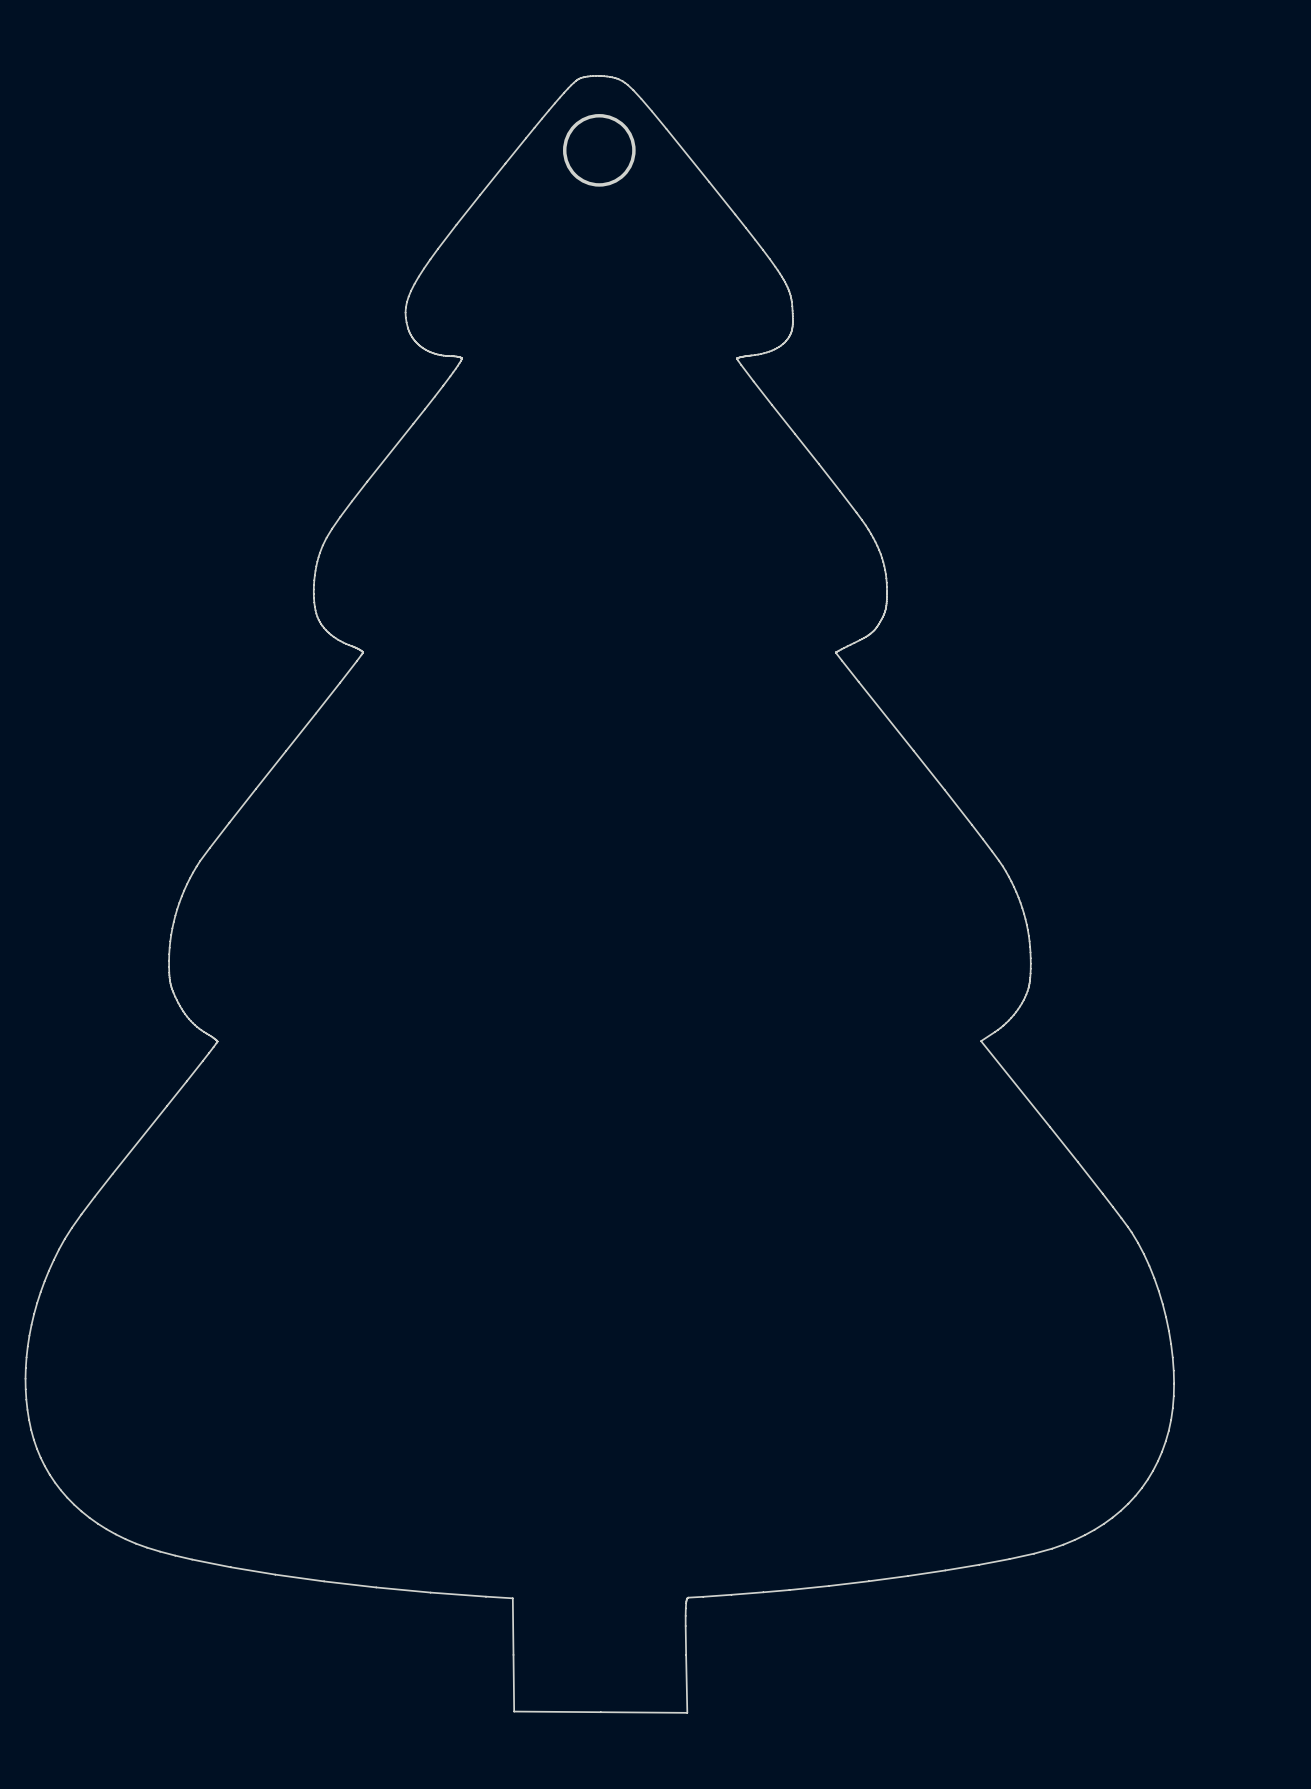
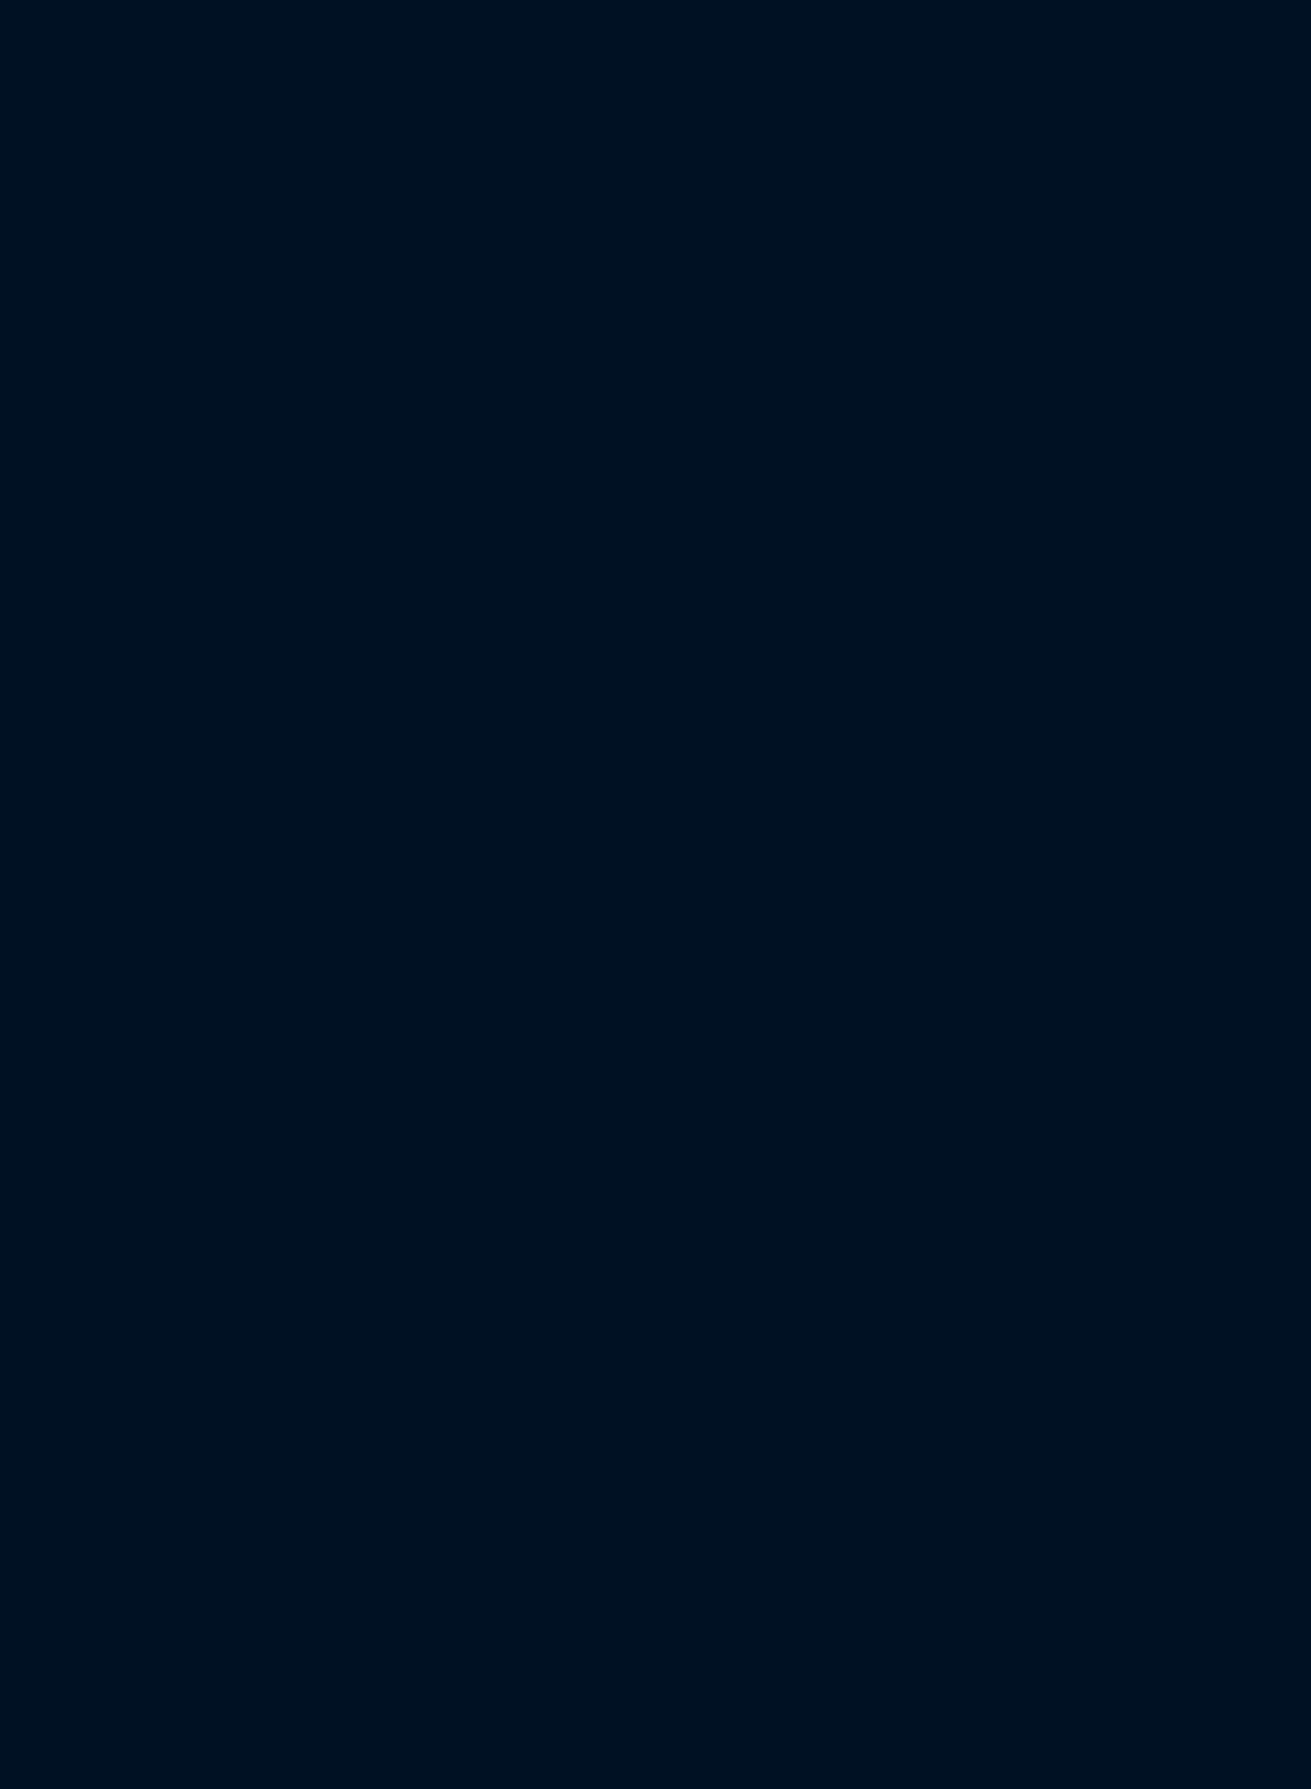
round board edge: [563, 114, 636, 187] -> none
board edge: (461, 358) (443, 385) (340, 516) (326, 537) (319, 552) (313, 584) (314, 602) (317, 616) (322, 625) (331, 635) (362, 652) -> none
board edge: (737, 358) (772, 350) (782, 344) (788, 337) (792, 327) (792, 313) (791, 297) (786, 284) (755, 239) (641, 98) (622, 81) (612, 77) (598, 75) (578, 79) (559, 97) (456, 224) (424, 268) (411, 290) (406, 302) (405, 317) (408, 330) (413, 339) (430, 352) (461, 358) -> none
board edge: (737, 358) (862, 520) (873, 537) (882, 558) (887, 591) (886, 607) (882, 616) (869, 634) (835, 652) -> none
board edge: (362, 652) (209, 847) (193, 872) (181, 896) (170, 941) (169, 967) (170, 985) (178, 1003) (188, 1018) (217, 1041) -> none
board edge: (835, 652) (983, 839) (1011, 881) (1020, 902) (1027, 930) (1030, 958) (1029, 985) (1023, 1000) (1013, 1015) (1000, 1027) (981, 1041) (1131, 1232) (1149, 1266) (1162, 1304) (1171, 1344) (1174, 1383) (1171, 1419) (1165, 1441) (1157, 1461) (1141, 1488) (1120, 1510) (1094, 1529) (1052, 1548) (979, 1564) (828, 1585) (687, 1597) (685, 1615) (687, 1712) (514, 1711) (512, 1598) (376, 1587) (275, 1574) (175, 1555) (146, 1547) (115, 1534) (89, 1517) (67, 1497) (49, 1474) (36, 1448) (29, 1420) (25, 1389) (26, 1357) (31, 1324) (48, 1270) (71, 1227) (217, 1041) -> none

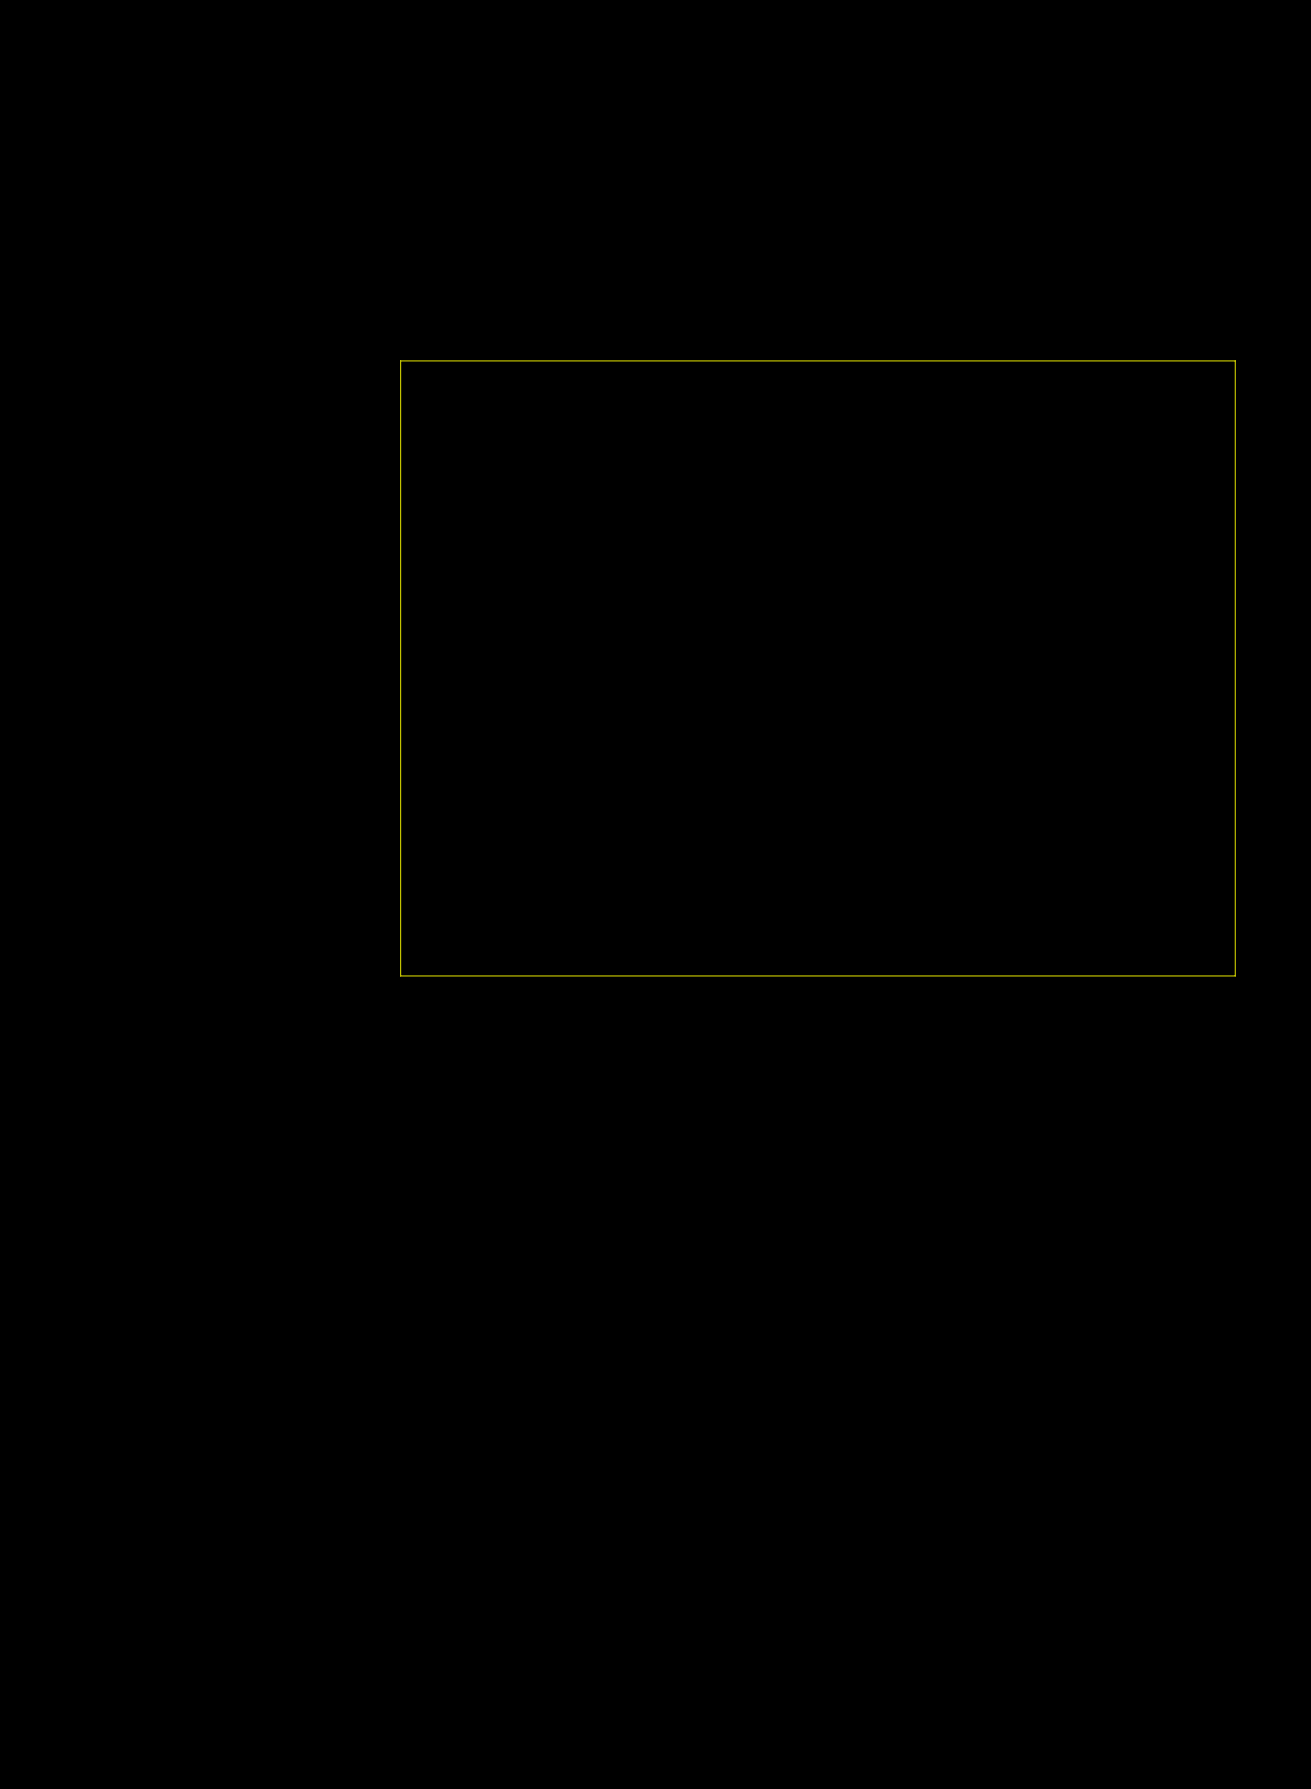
board edge: none -> (1235, 360) (400, 360) (400, 975) (1235, 975) (1235, 360)

